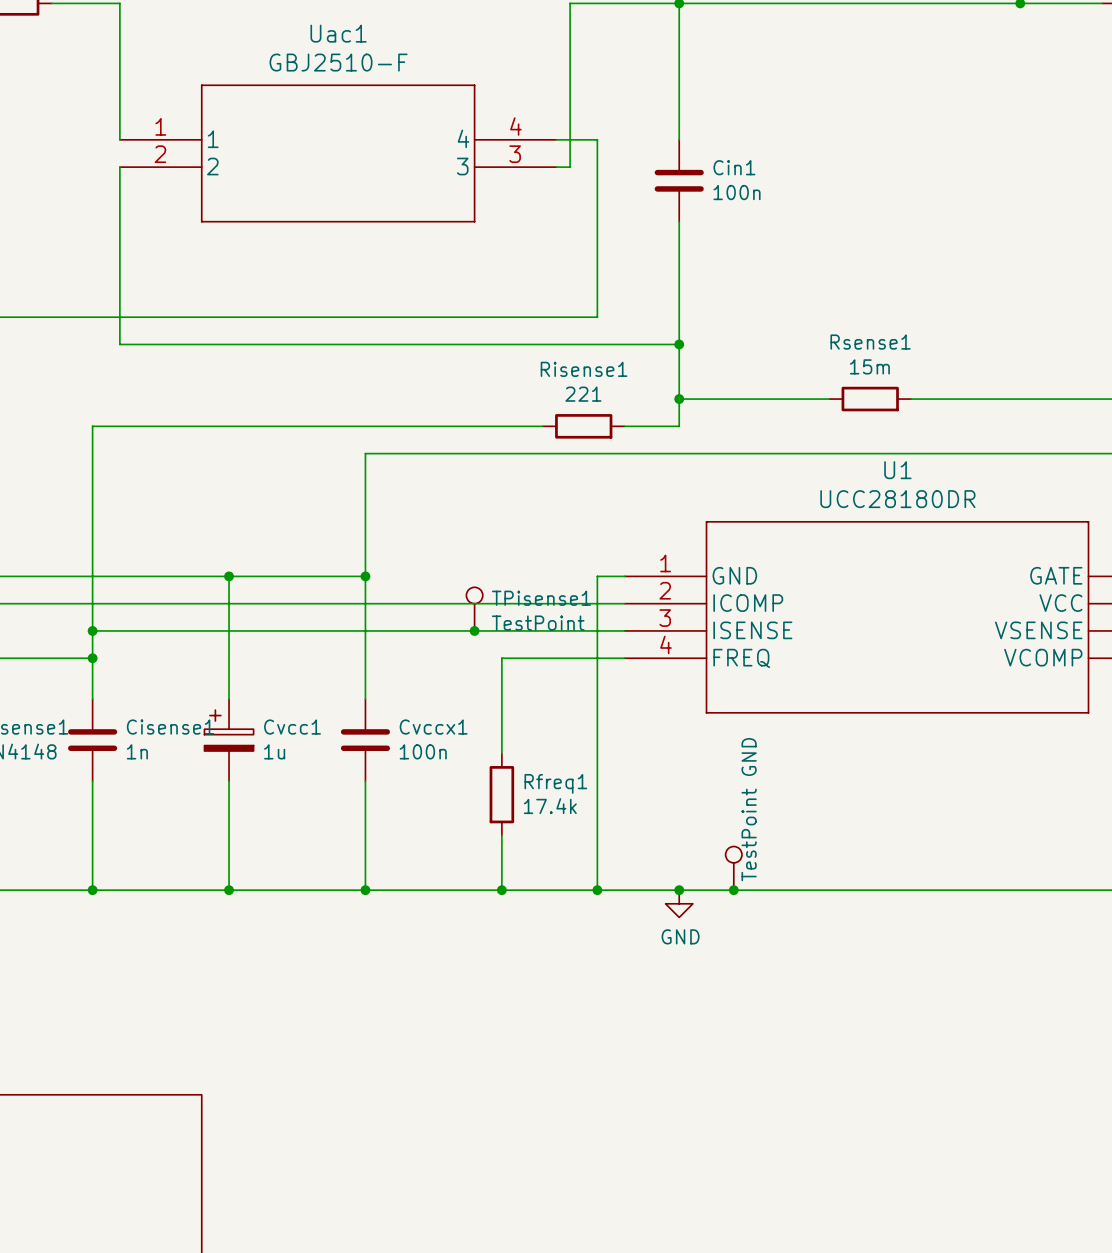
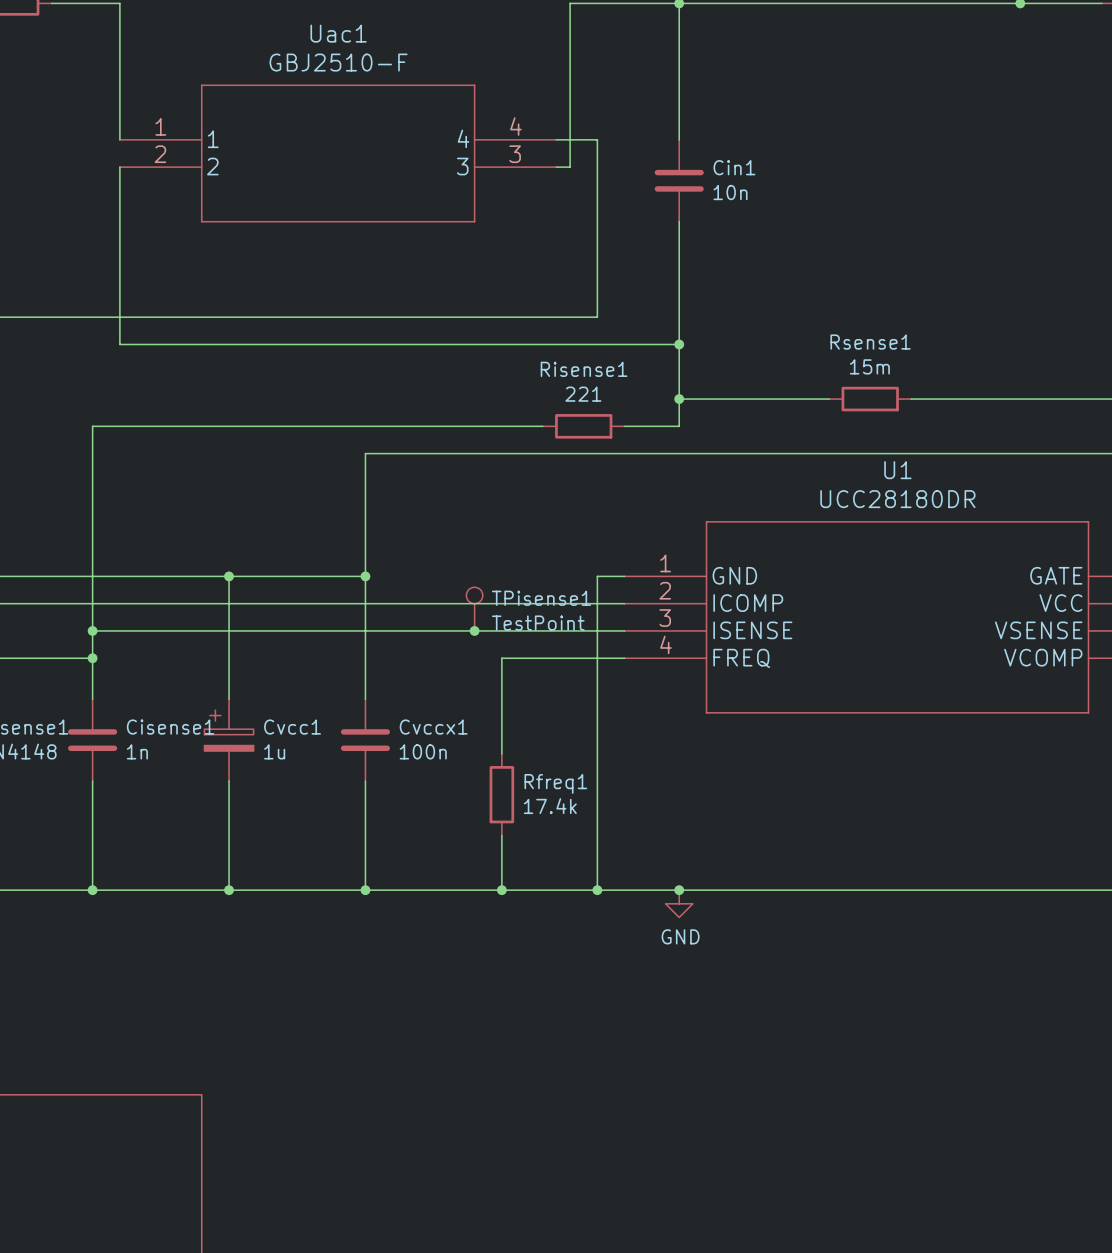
Cin1 value: 100n (737, 192) -> 10n (730, 192)
part: TestPoint GND (733, 868) -> none
junction: (733, 890) -> none

